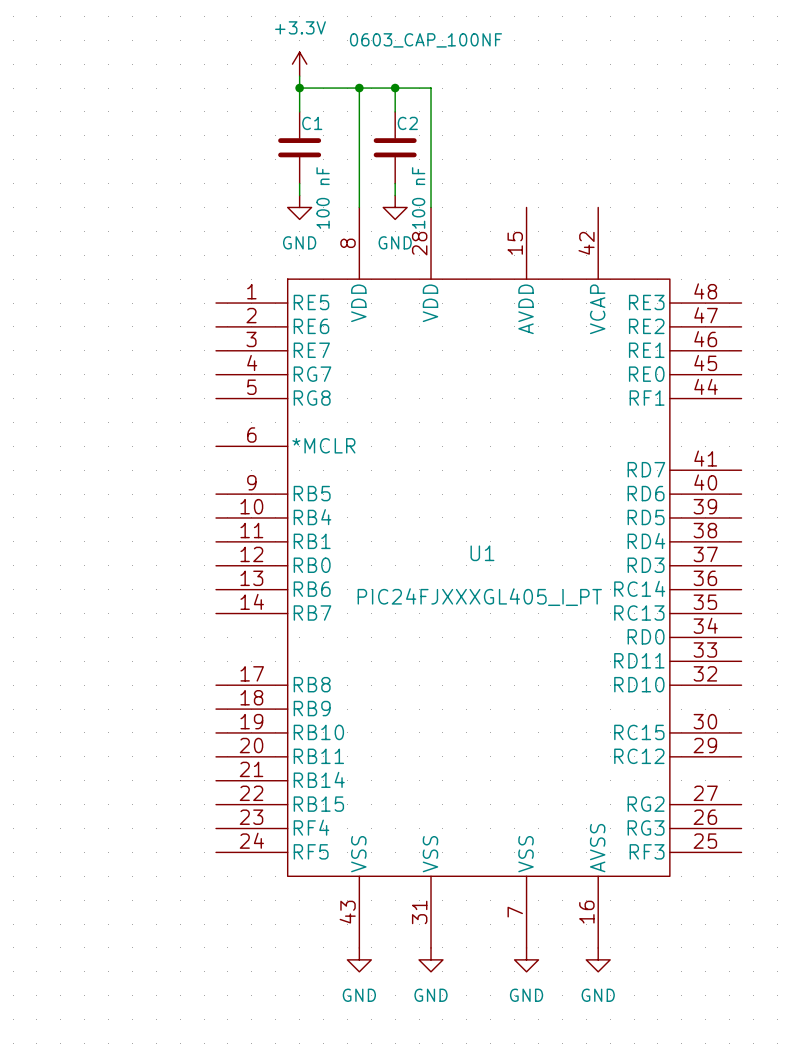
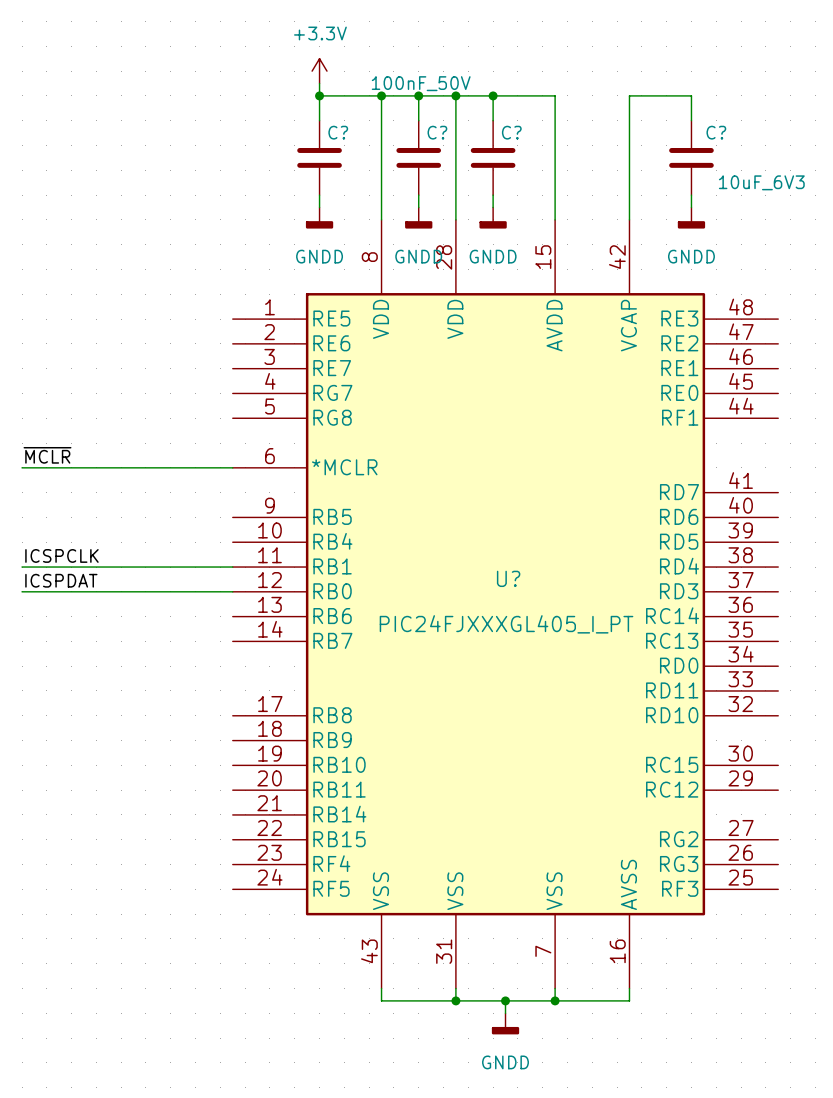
C2 text: 0603_CAP_100NF (425, 40) -> none
wire: none -> (455, 95) (555, 95) (555, 219)
junction: none -> (455, 95)
wire: none -> (493, 95) (493, 120)
junction: none -> (493, 95)
wire: none -> (691, 120) (691, 95) (629, 95) (629, 219)
C1 name: C1 (312, 123) -> C? (338, 132)
C2 name: C2 (407, 123) -> C? (437, 132)
C?: none -> (493, 157)
C?: none -> 10uF_6V3 (691, 157)
wire: none -> (493, 195) (493, 207)
wire: none -> (691, 195) (691, 207)
C1 value: 100 nF (323, 198) -> none
C2 value: 100 nF (418, 198) -> 100nF_50V (421, 83)
power symbol: none -> GNDD (493, 218)
power symbol: none -> GNDD (691, 218)
power symbol: GND (299, 207) -> GNDD (319, 218)
power symbol: GND (395, 207) -> GNDD (418, 218)
label: none -> ~{MCLR} (47, 455)
wire: none -> (22, 467) (232, 467)
label: none -> ICSPCLK (61, 555)
wire: none -> (22, 567) (232, 567)
label: none -> ICSPDAT (61, 580)
wire: none -> (22, 591) (232, 591)
U1: PIC24FJXXXGL405_I_PT (478, 577) -> none
U?: none -> PIC24FJXXXGL405_I_PT (505, 604)
wire: none -> (381, 988) (381, 1000) (629, 1000) (629, 988)
power symbol: GND (359, 959) -> none
power symbol: GND (431, 959) -> none
junction: none -> (455, 1000)
wire: none -> (505, 1000) (505, 1013)
junction: none -> (505, 1000)
power symbol: GND (526, 959) -> none
junction: none -> (555, 1000)
power symbol: GND (598, 959) -> none
power symbol: none -> GNDD (505, 1023)

